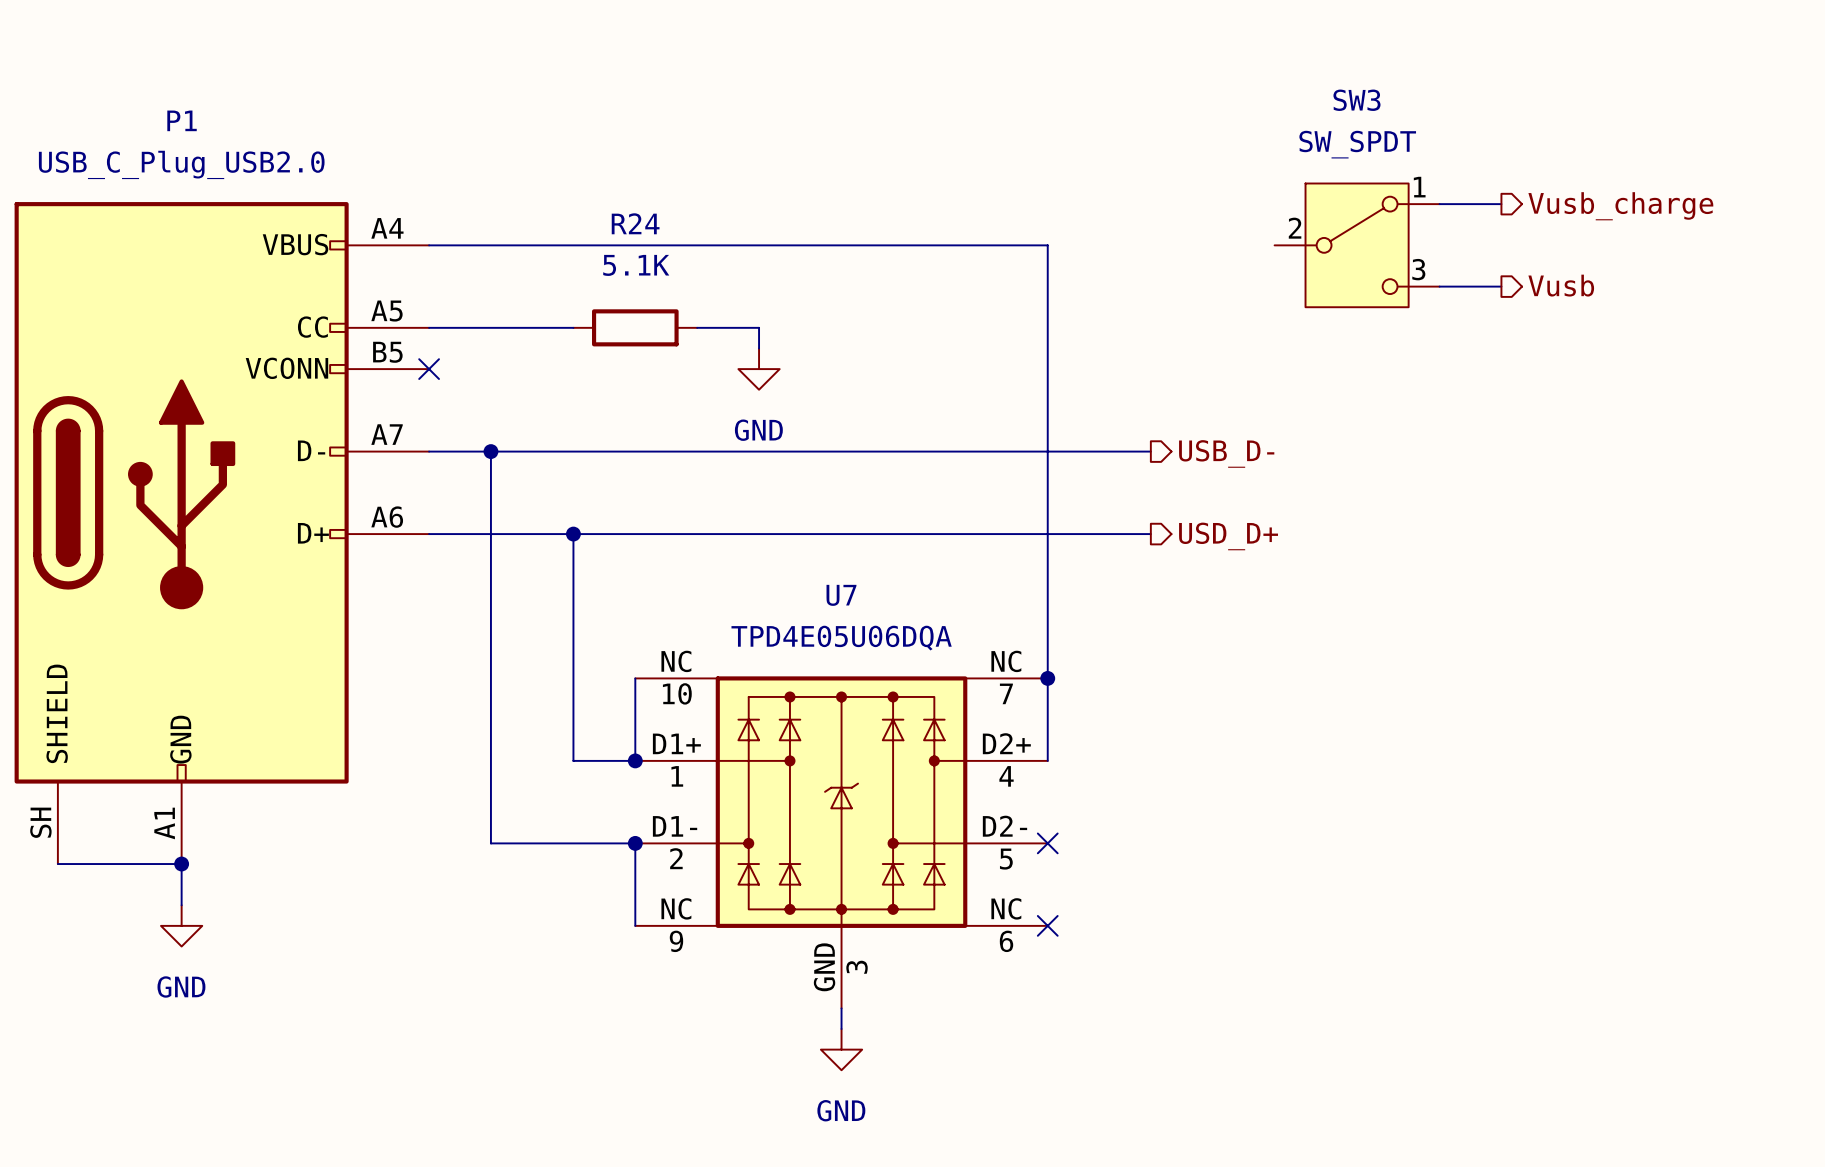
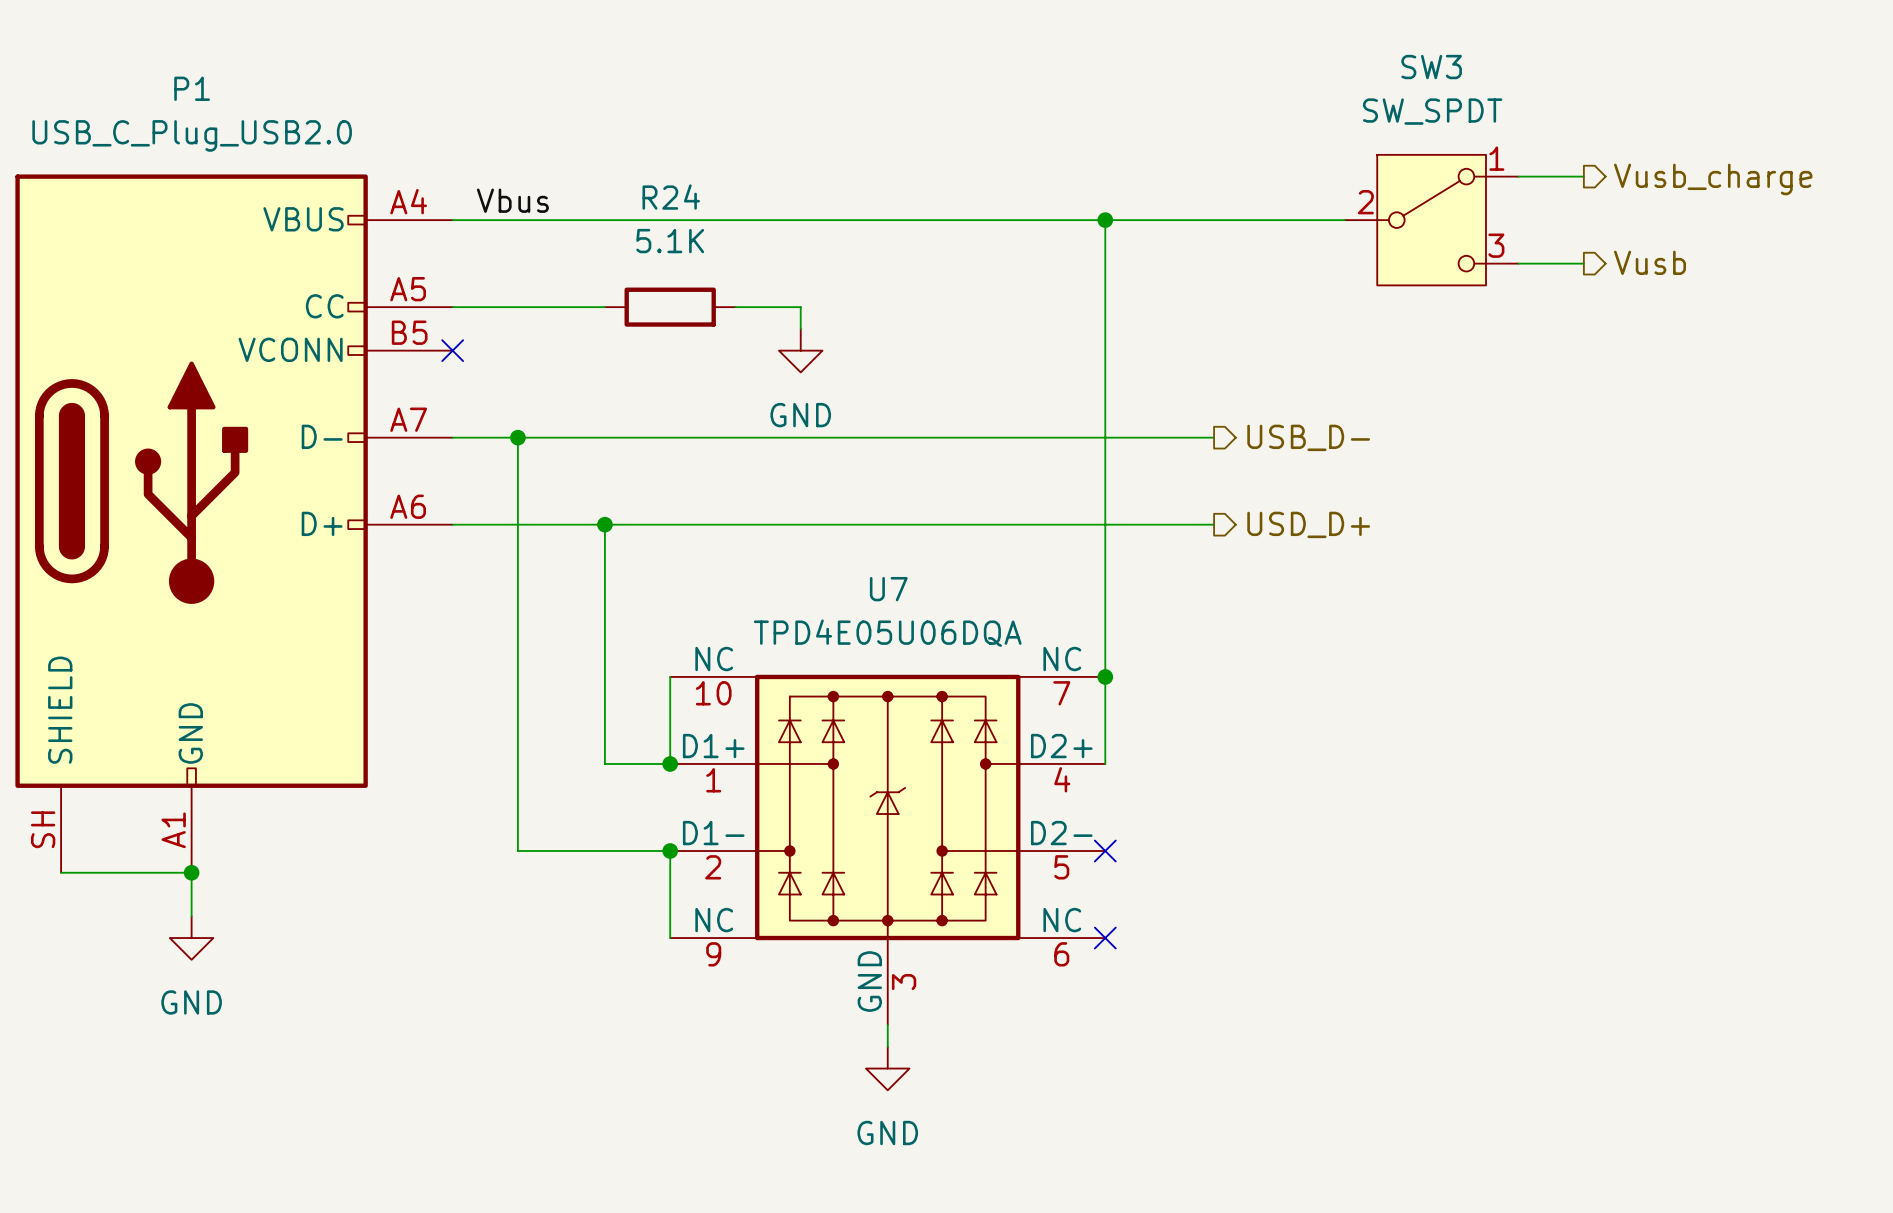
label: none -> Vbus (512, 200)
wire: none -> (1105, 220) (1344, 220)
junction: none -> (1105, 220)

